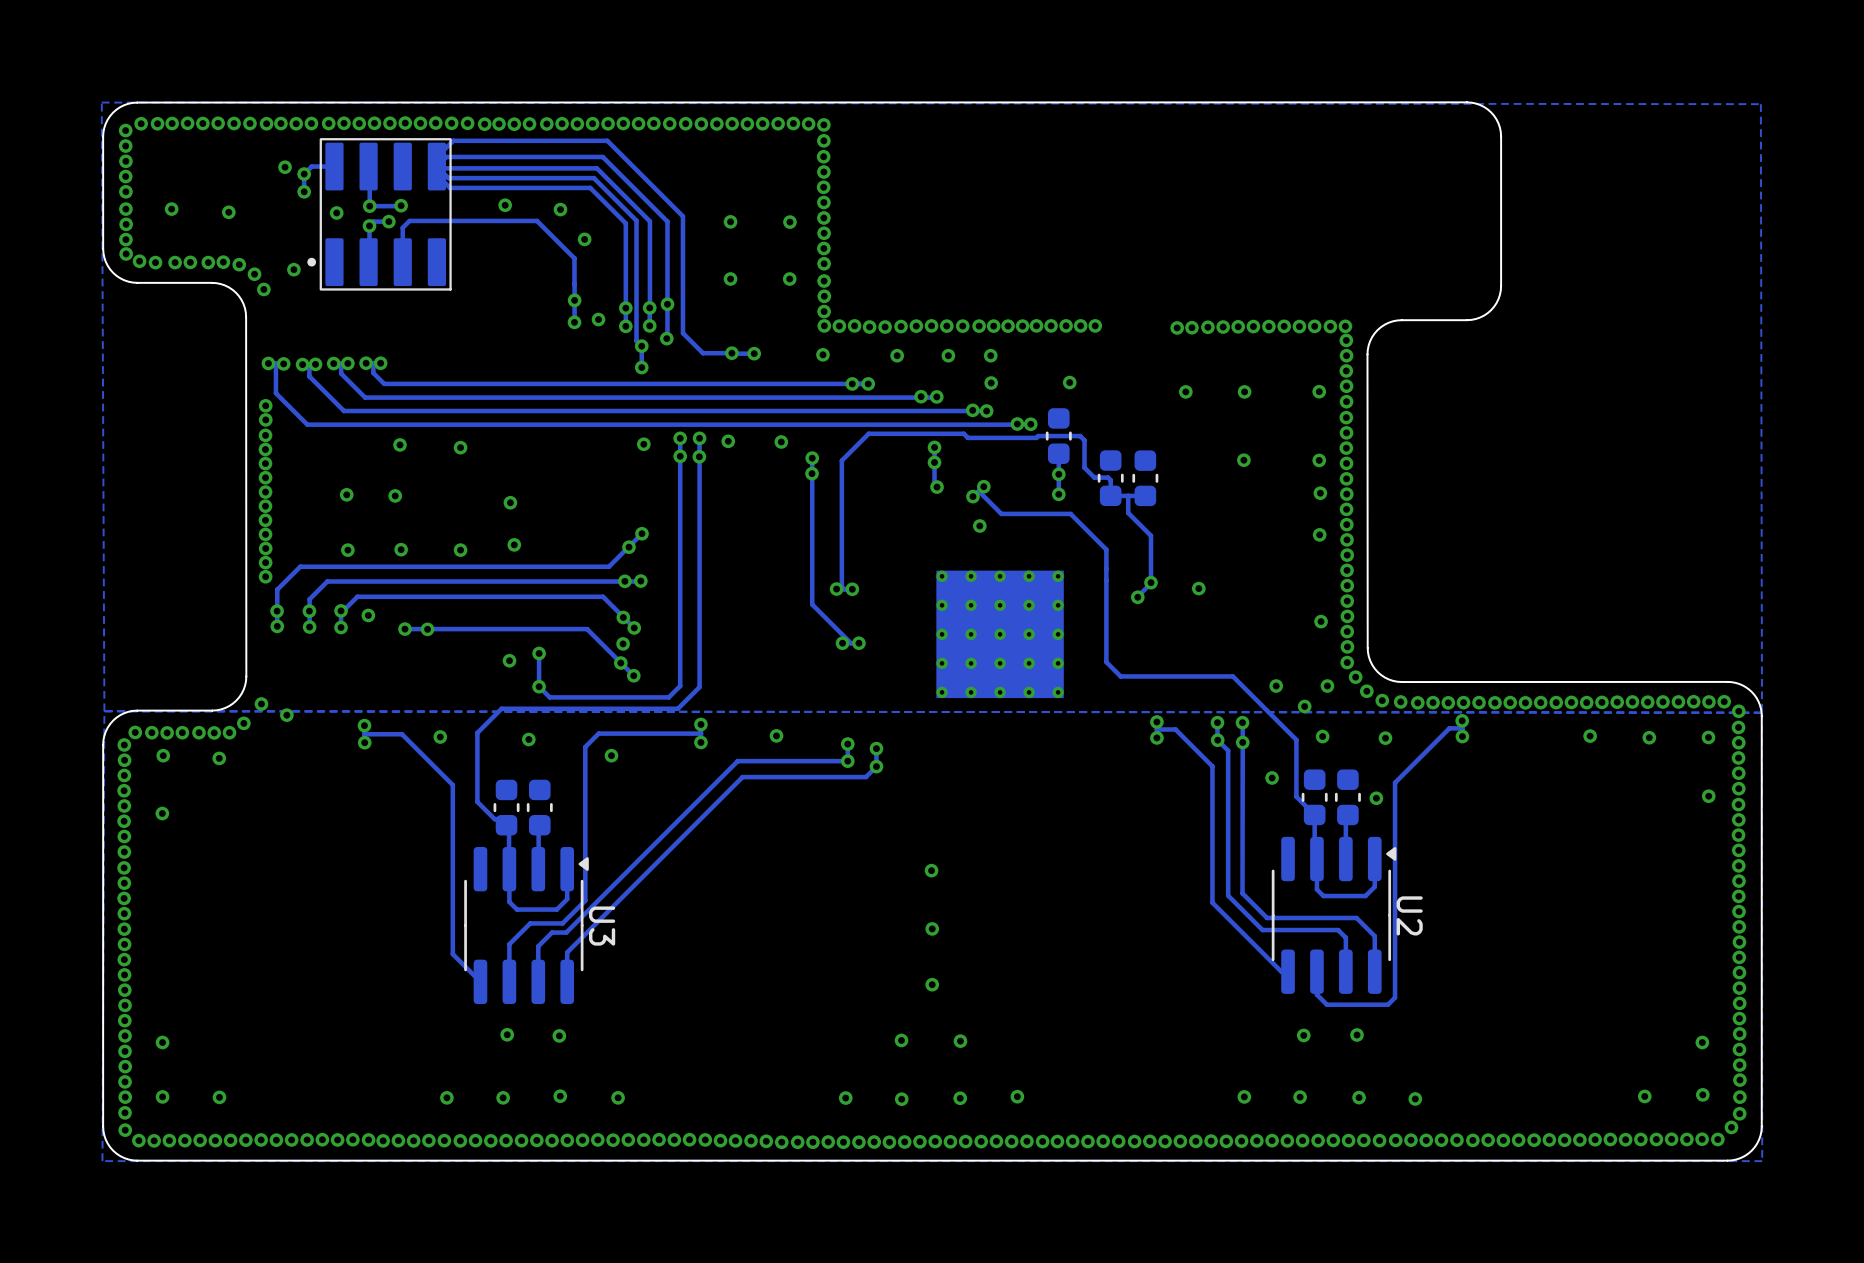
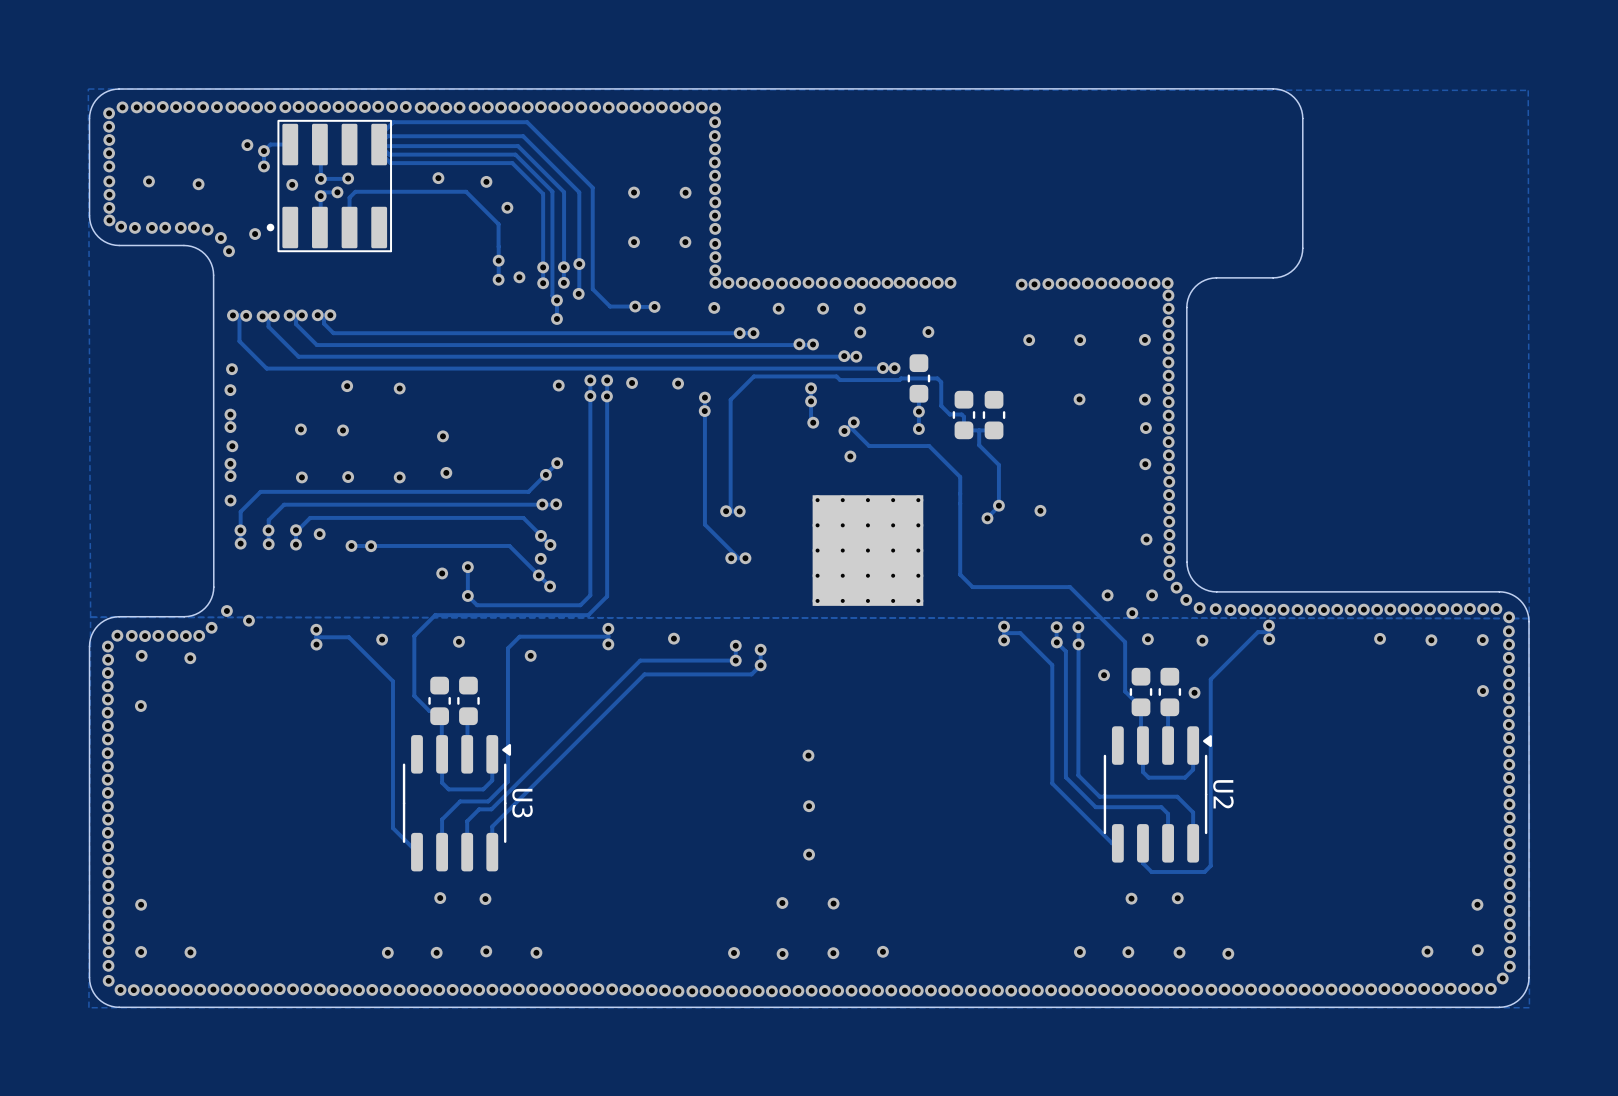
via: (265, 405) -> none
via: (265, 419) -> none
via: none -> (231, 369)
via: (265, 435) -> none
via: (265, 463) -> none
via: (265, 506) -> none
via: none -> (232, 446)
via: (265, 520) -> none
via: (265, 562) -> none

